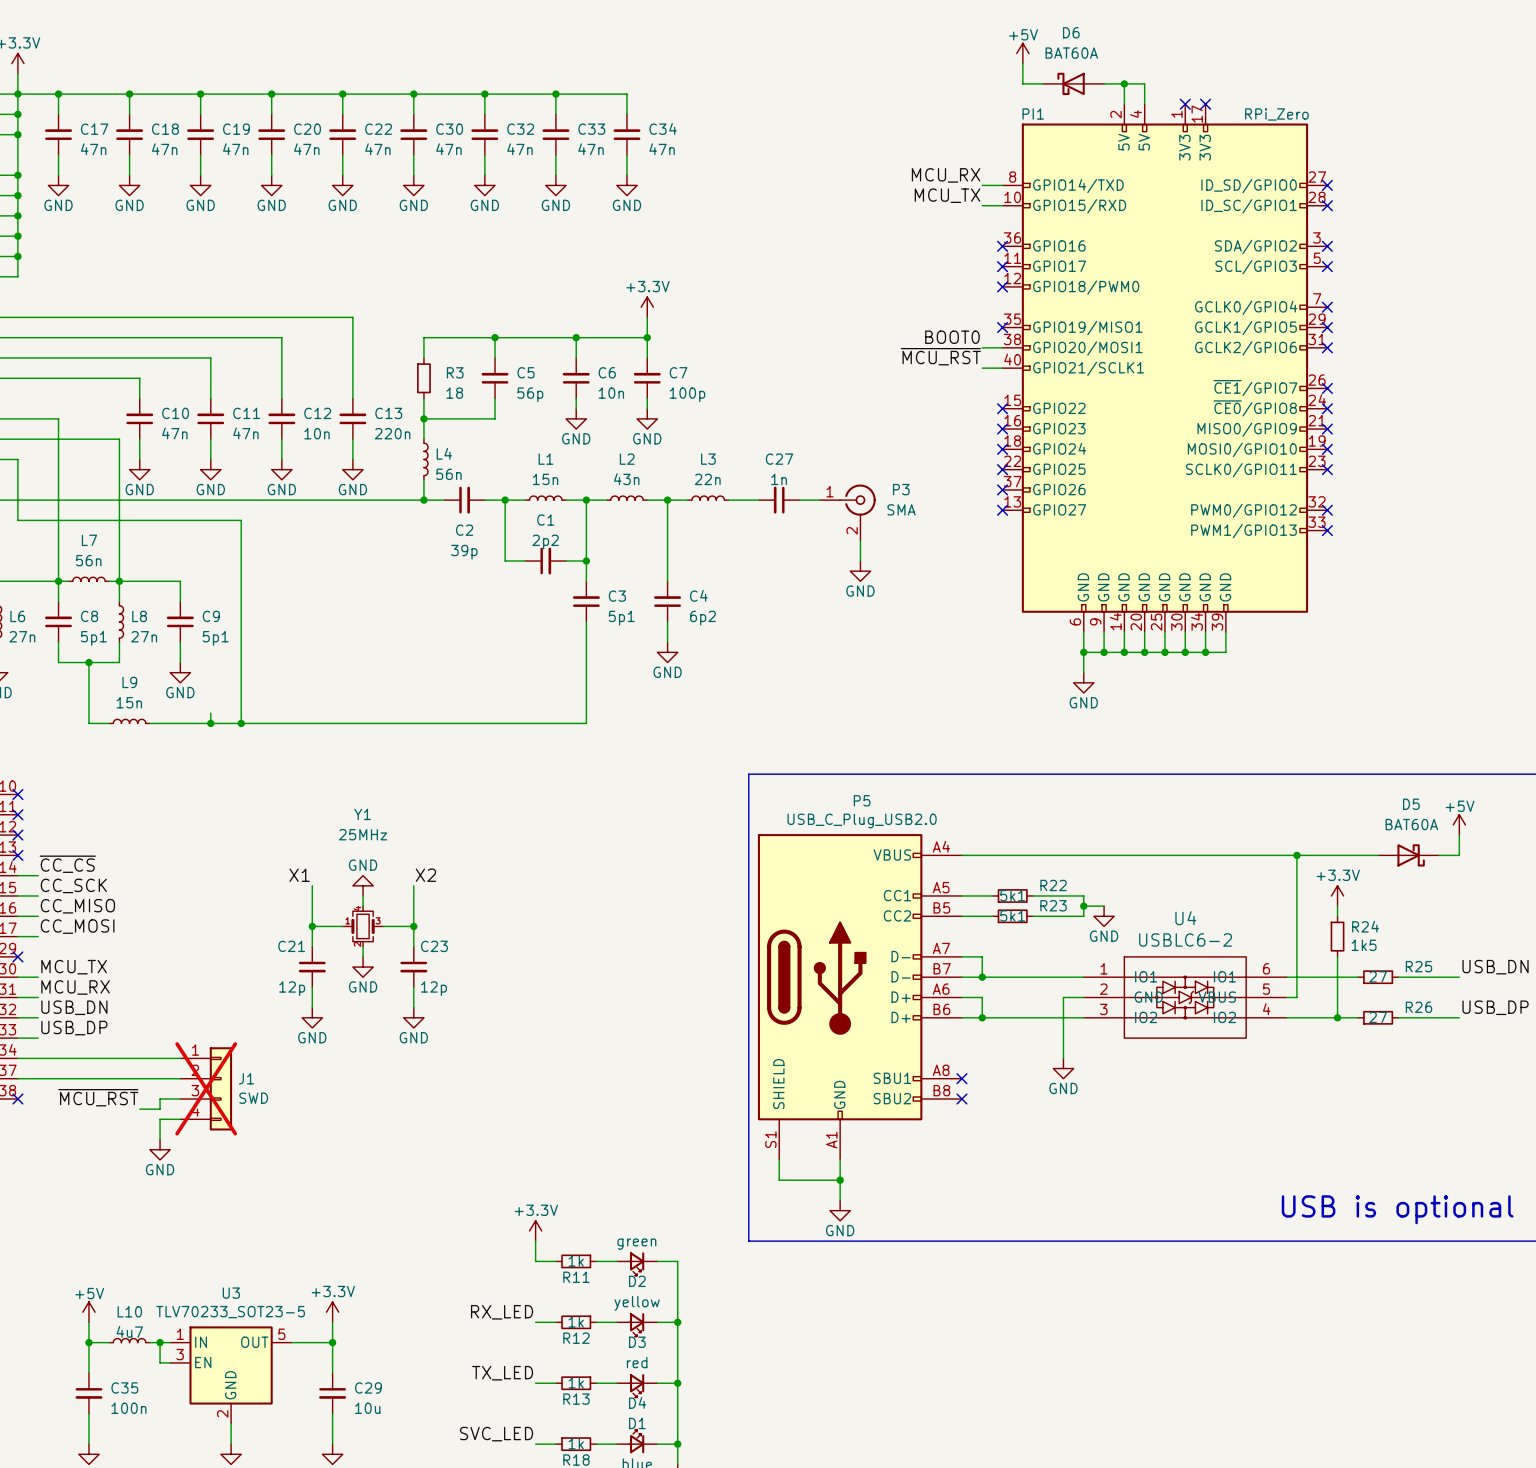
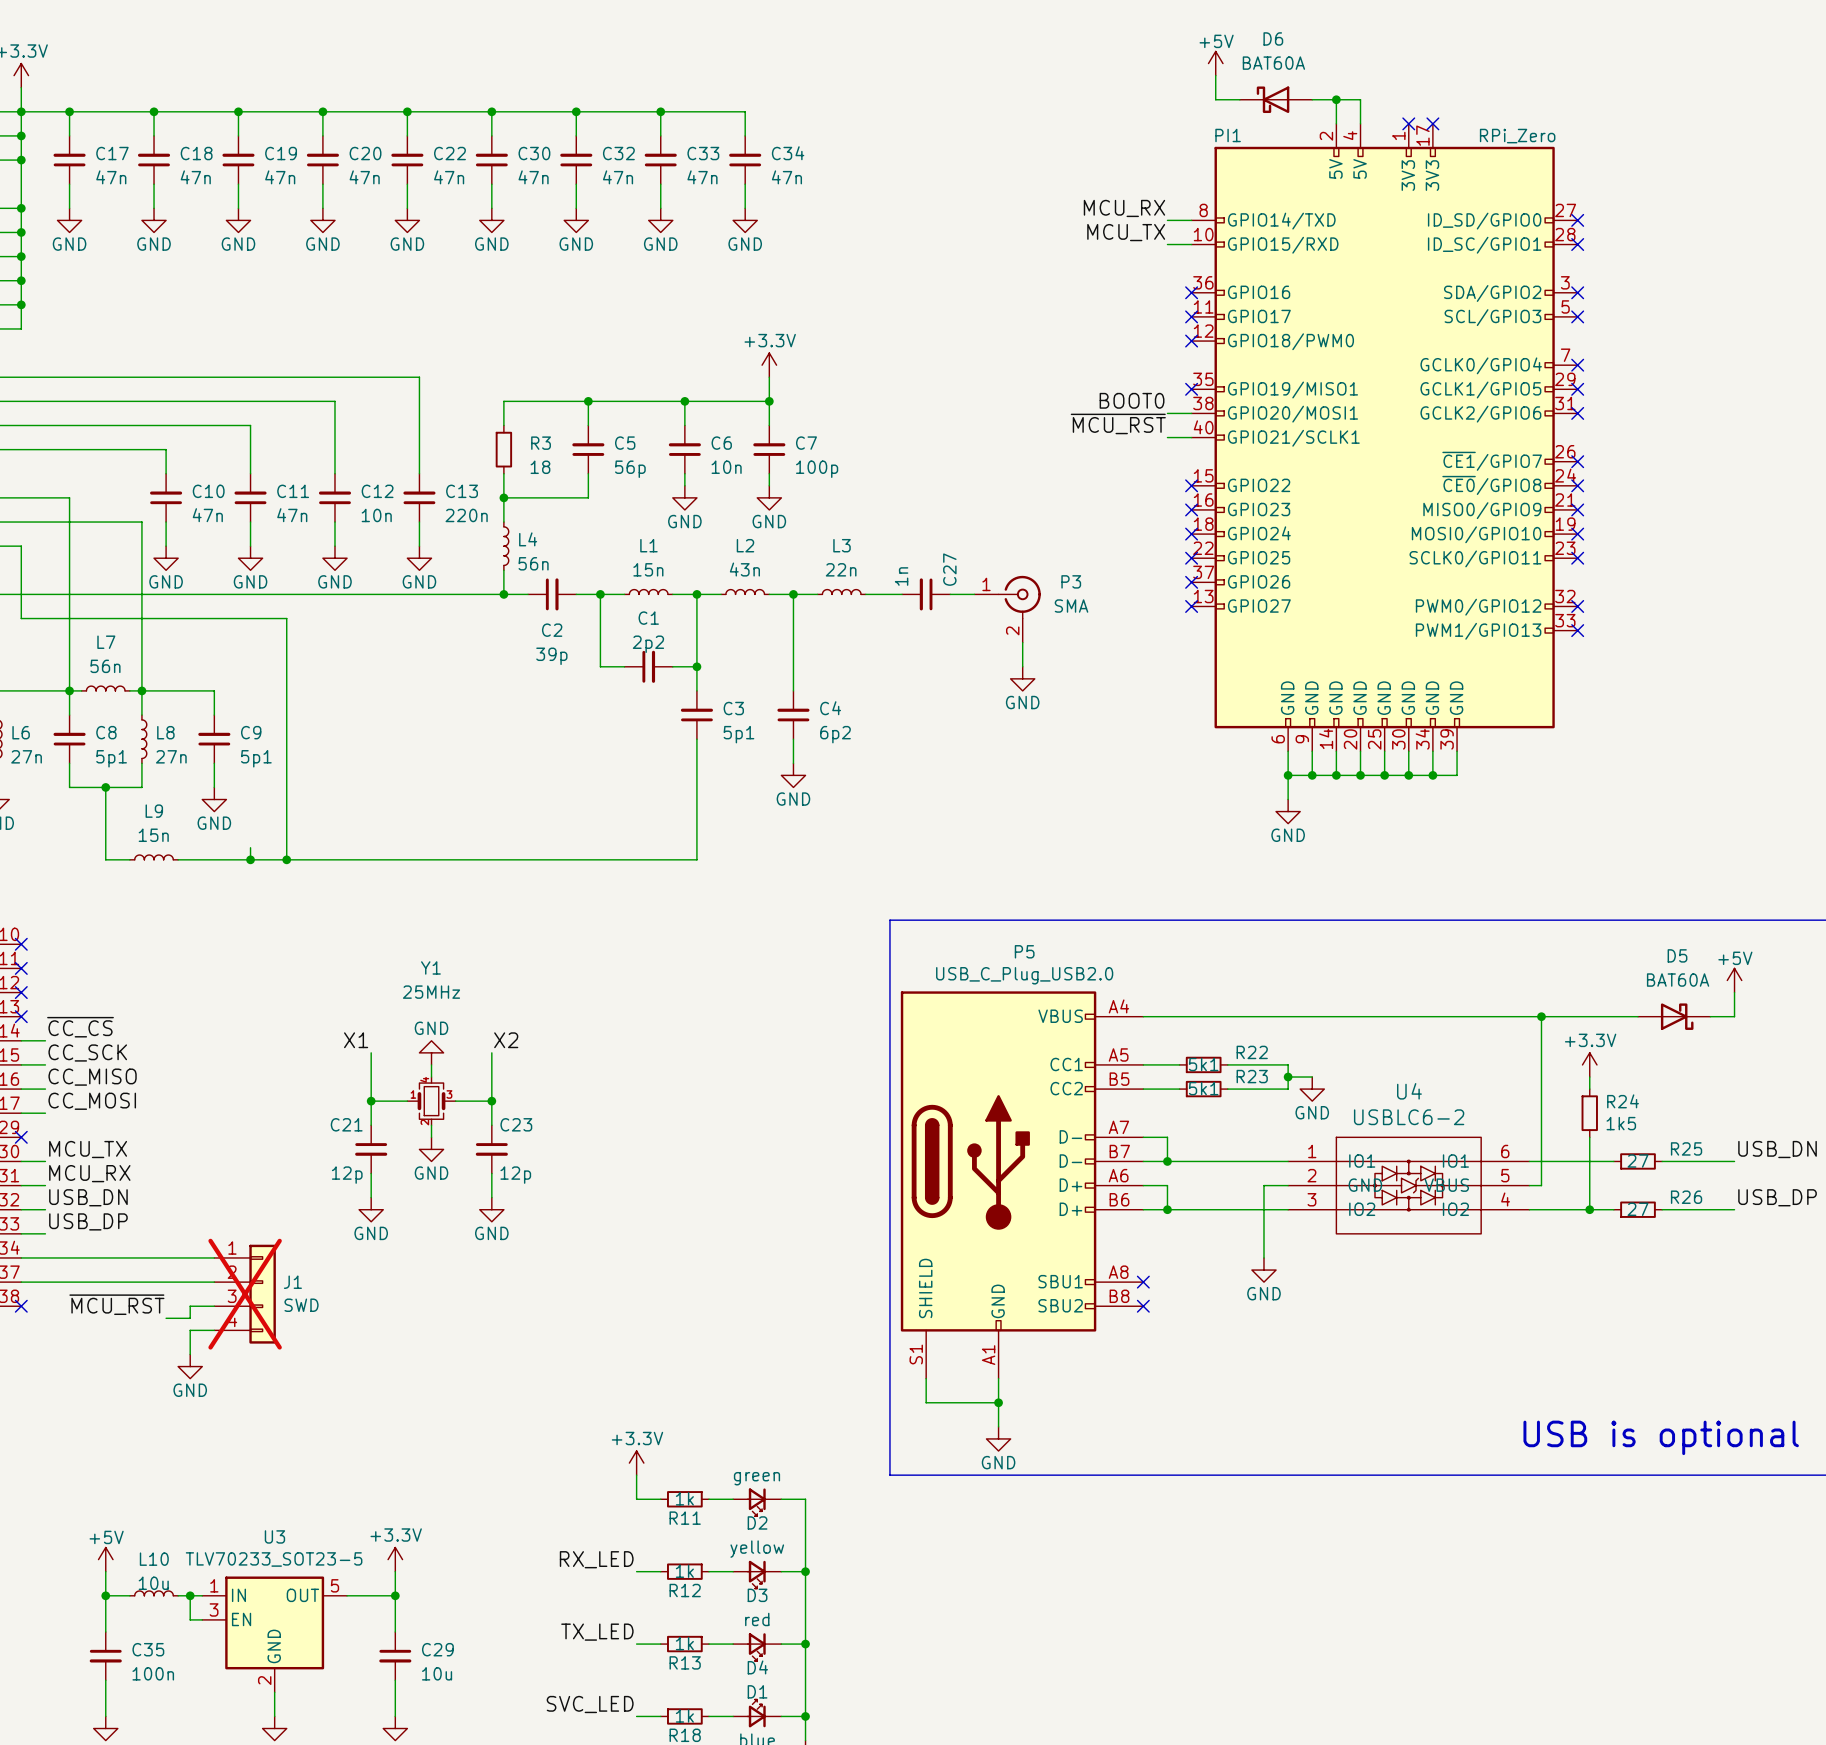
C27 name rotation: 0° (779, 459) -> 90° counterclockwise (949, 569)
C27 value rotation: 0° (779, 479) -> 90° counterclockwise (901, 576)
L10 value: 4u7 (129, 1331) -> 10u (153, 1583)

